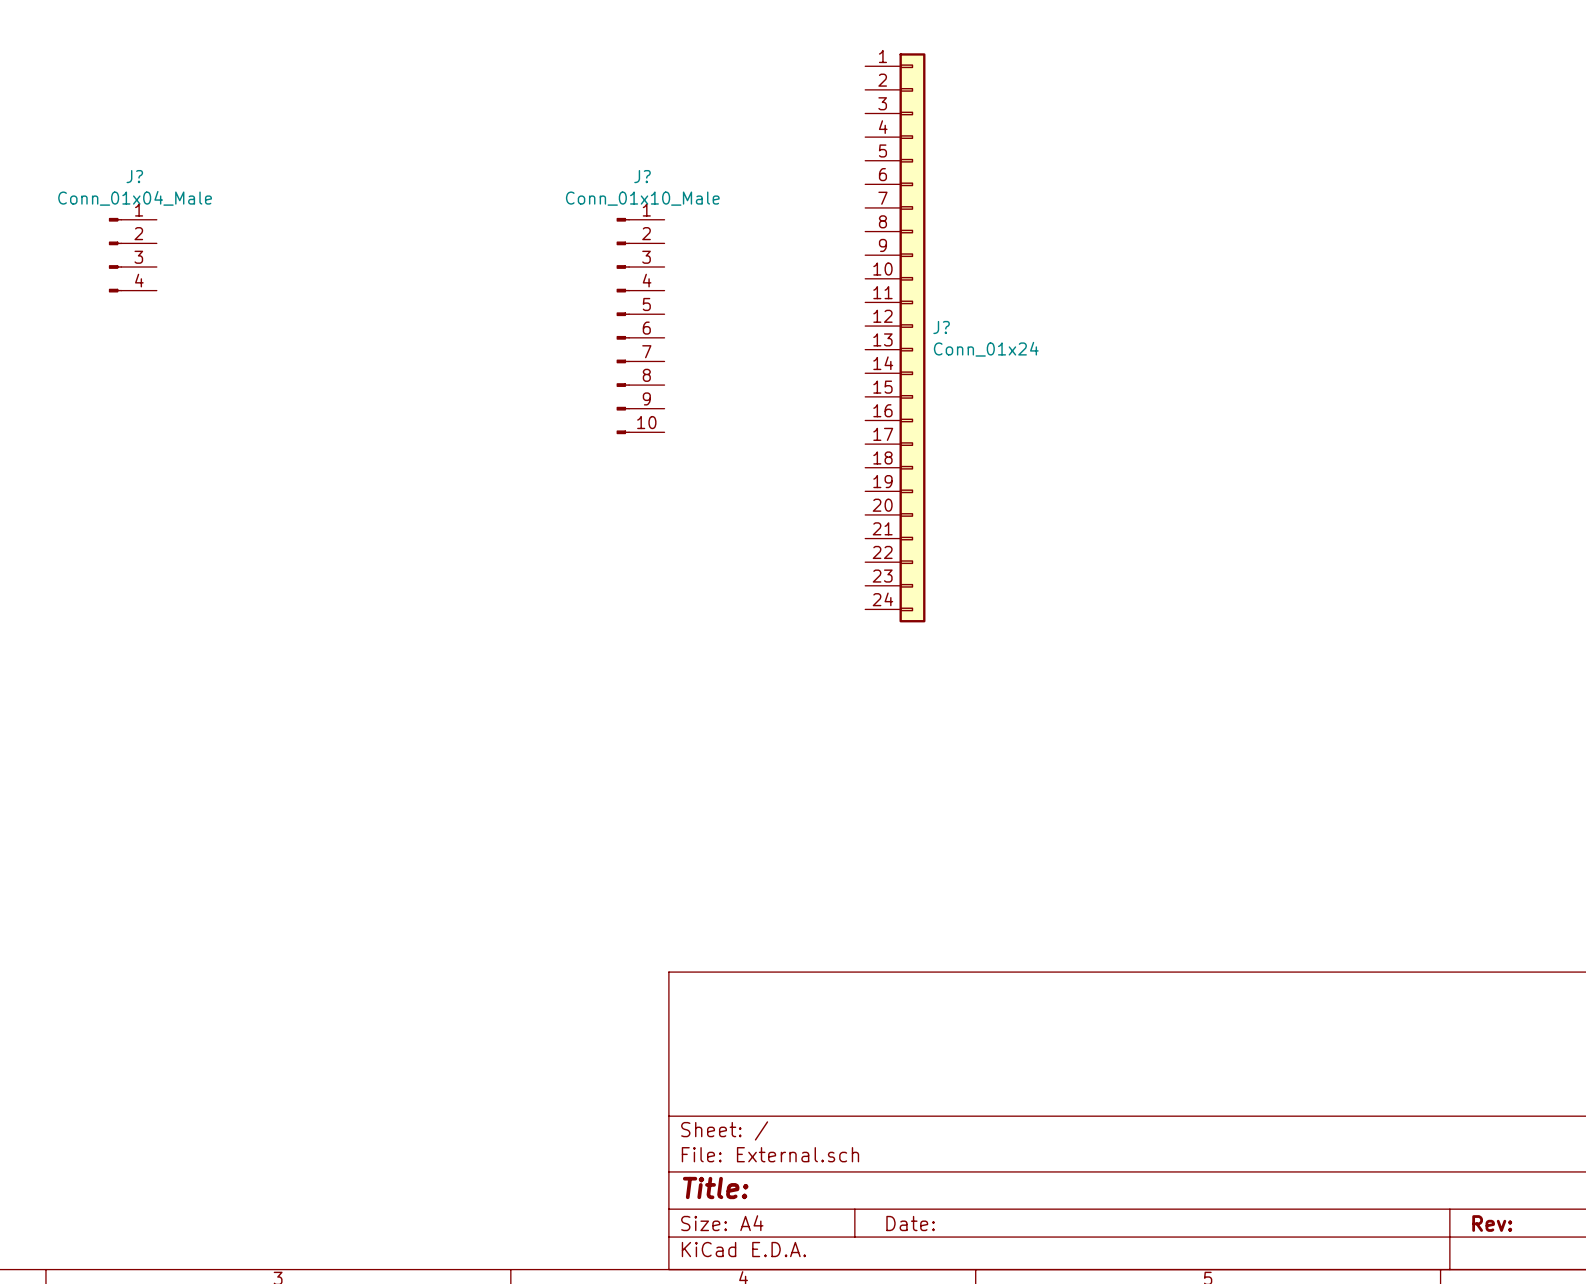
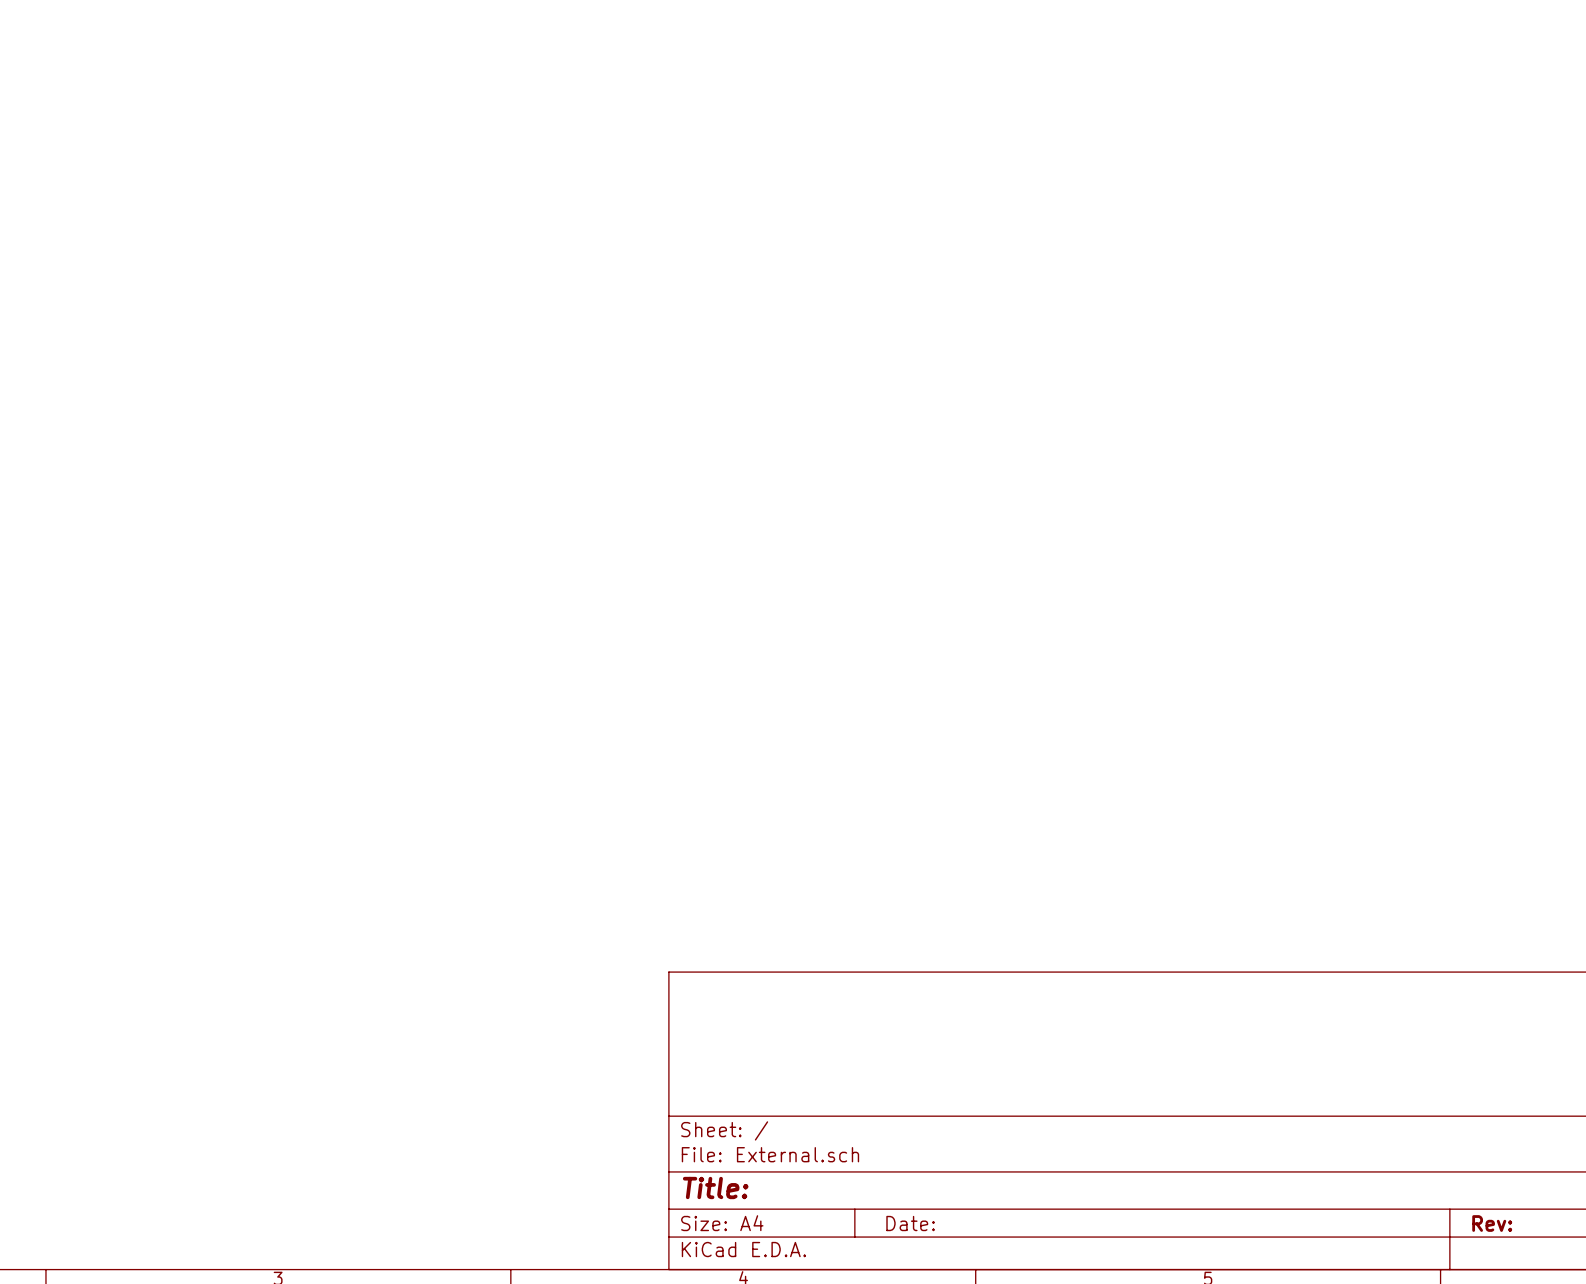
J?: Conn_01x04_Male (132, 255) -> none
J?: Conn_01x10_Male (640, 326) -> none
J?: Conn_01x24 (895, 337) -> none

